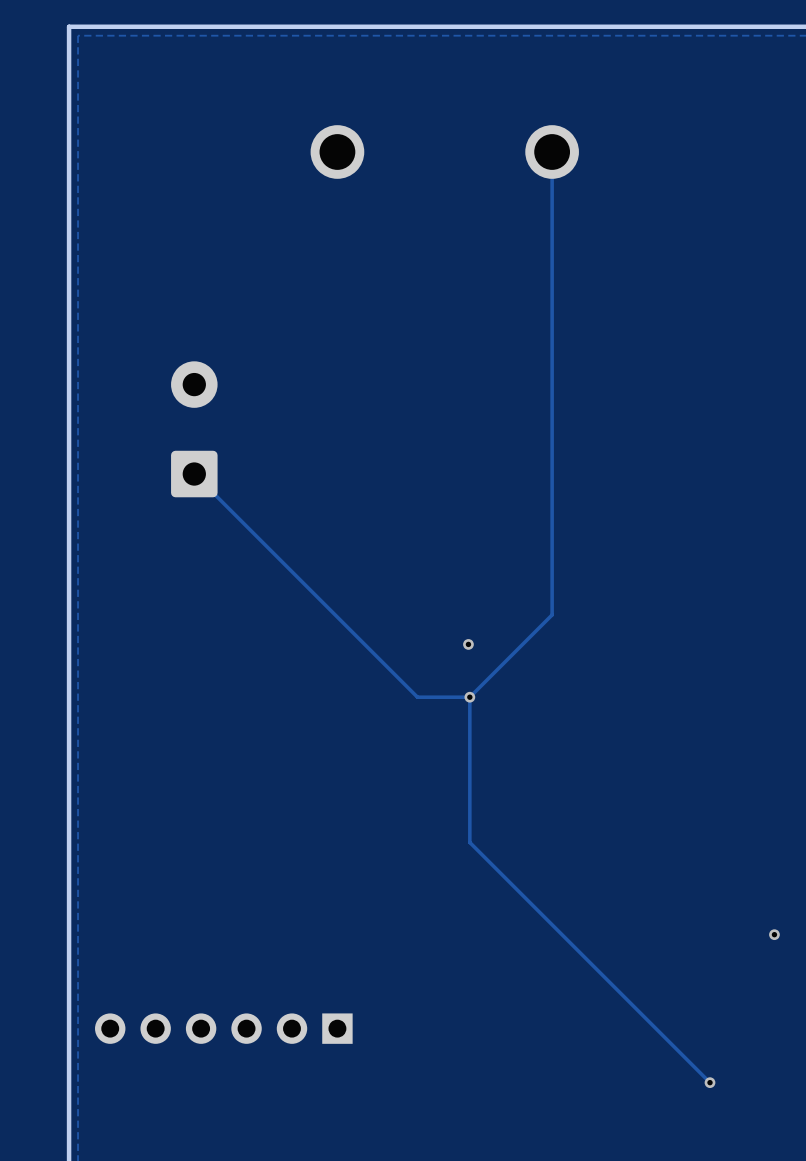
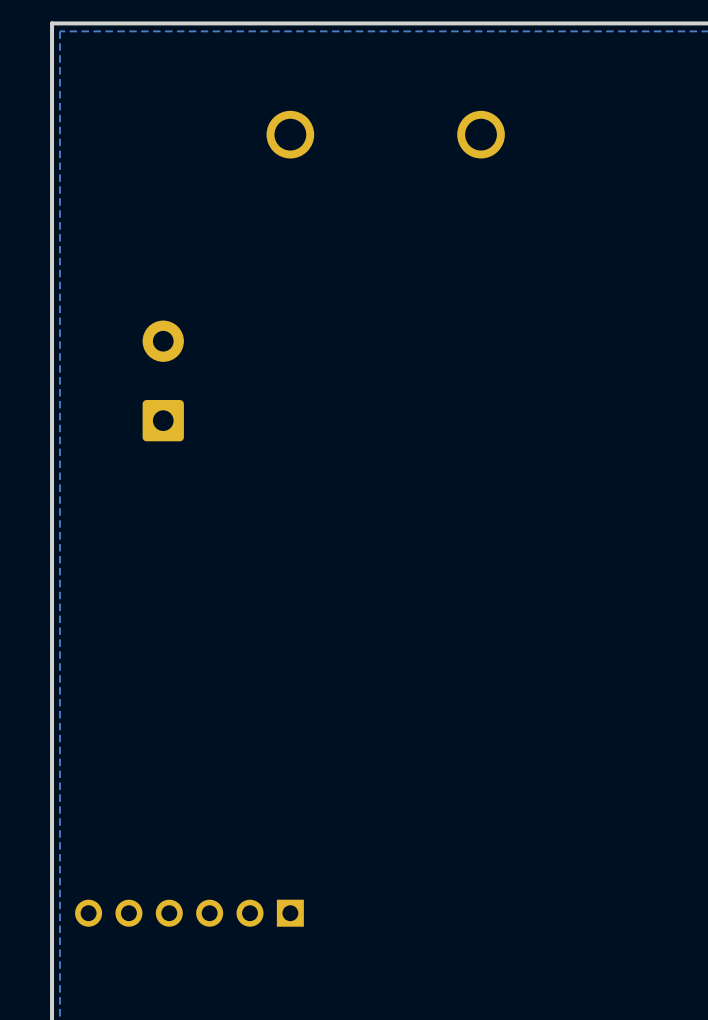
track: (552, 151) (552, 614) (469, 697) -> none
track: (194, 474) (417, 697) (469, 697) -> none
via: (468, 644) -> none
track: (469, 697) (469, 842) (710, 1082) -> none
via: (469, 697) -> none
via: (774, 934) -> none
via: (710, 1082) -> none

